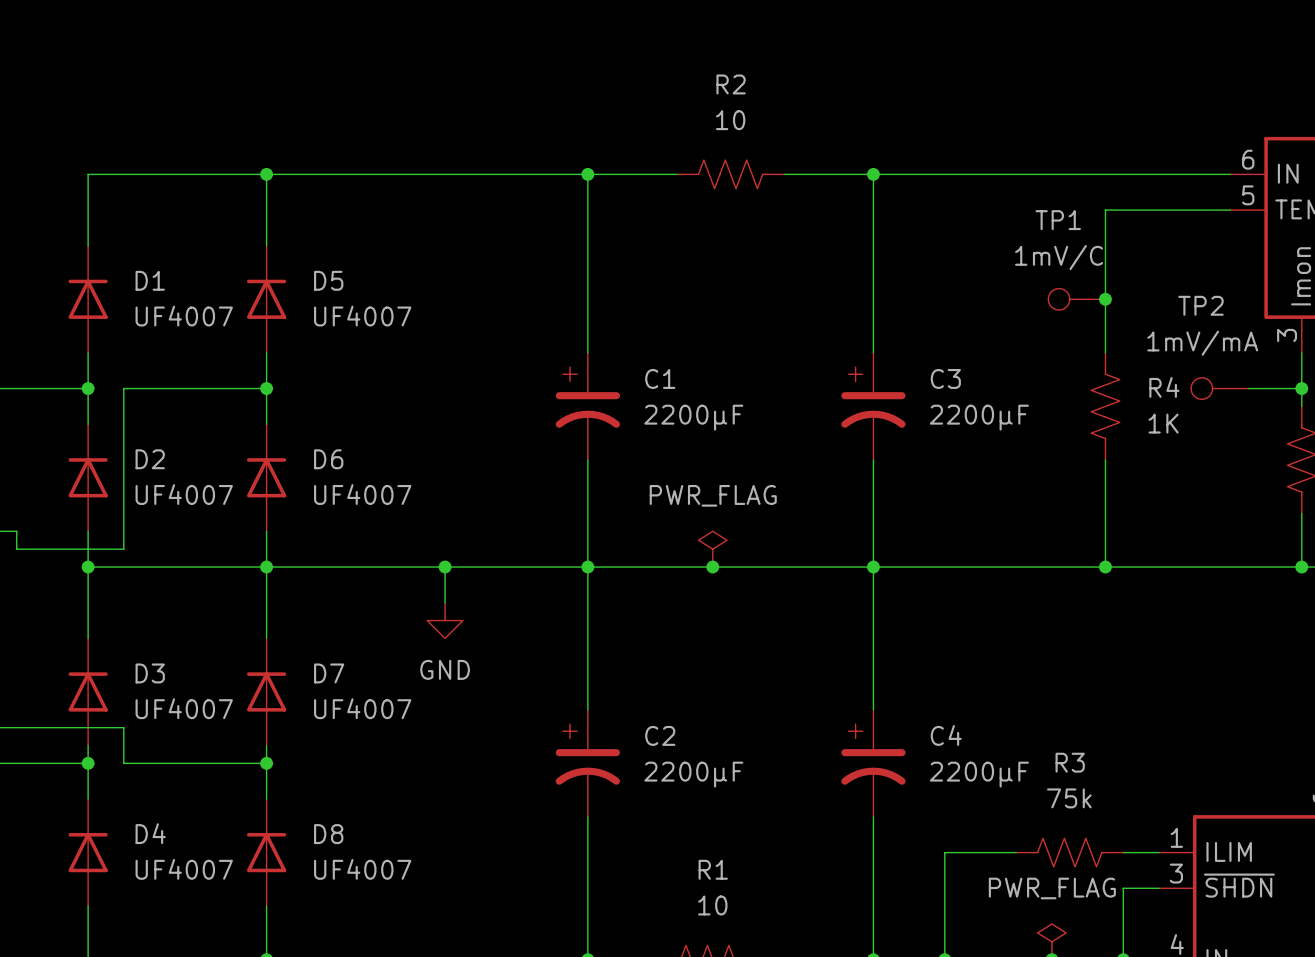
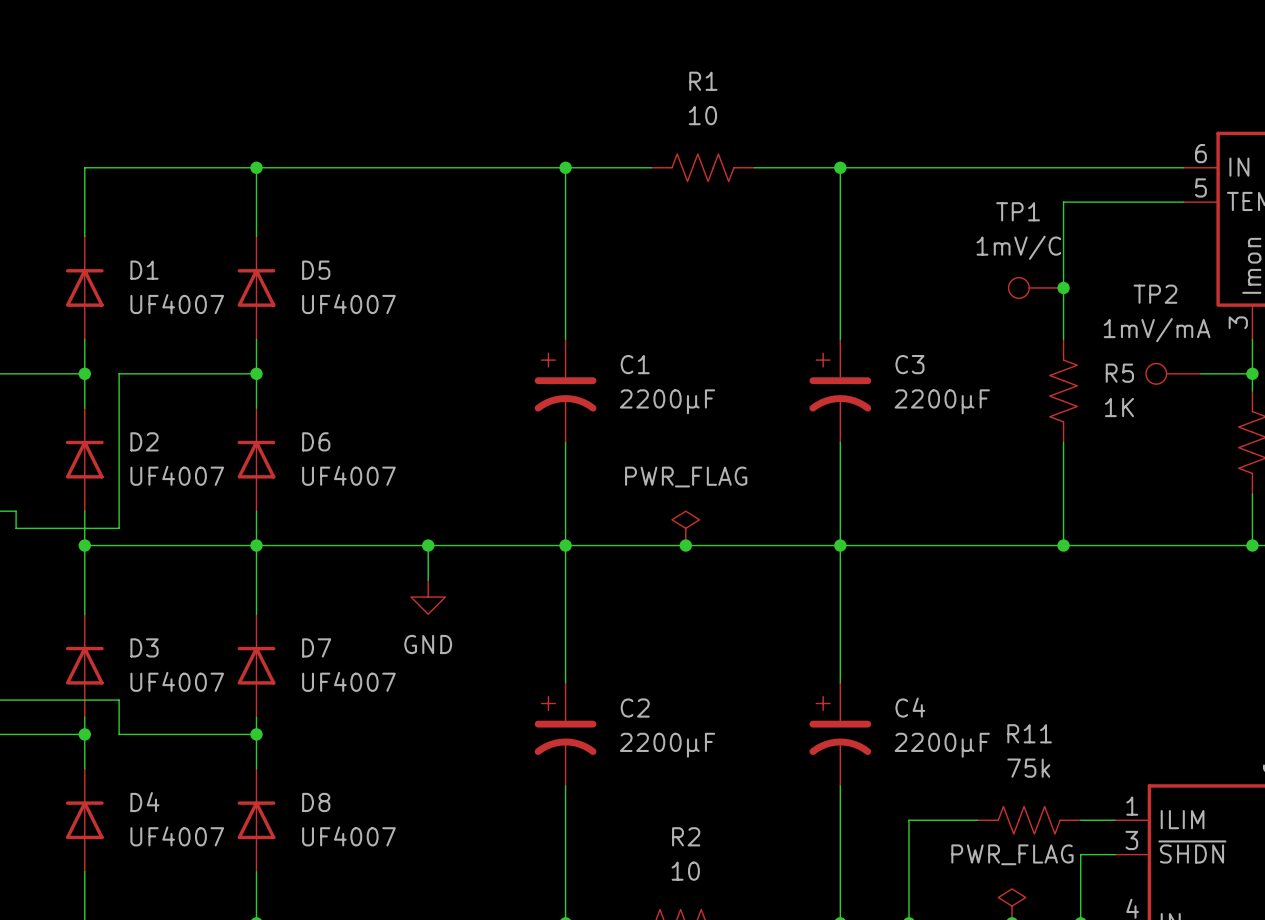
R2 name: R2 (731, 84) -> R1 (703, 81)
R4 name: R4 (1164, 387) -> R5 (1119, 373)
R3 name: R3 (1070, 762) -> R11 (1029, 733)
R1 name: R1 (713, 869) -> R2 (686, 836)

